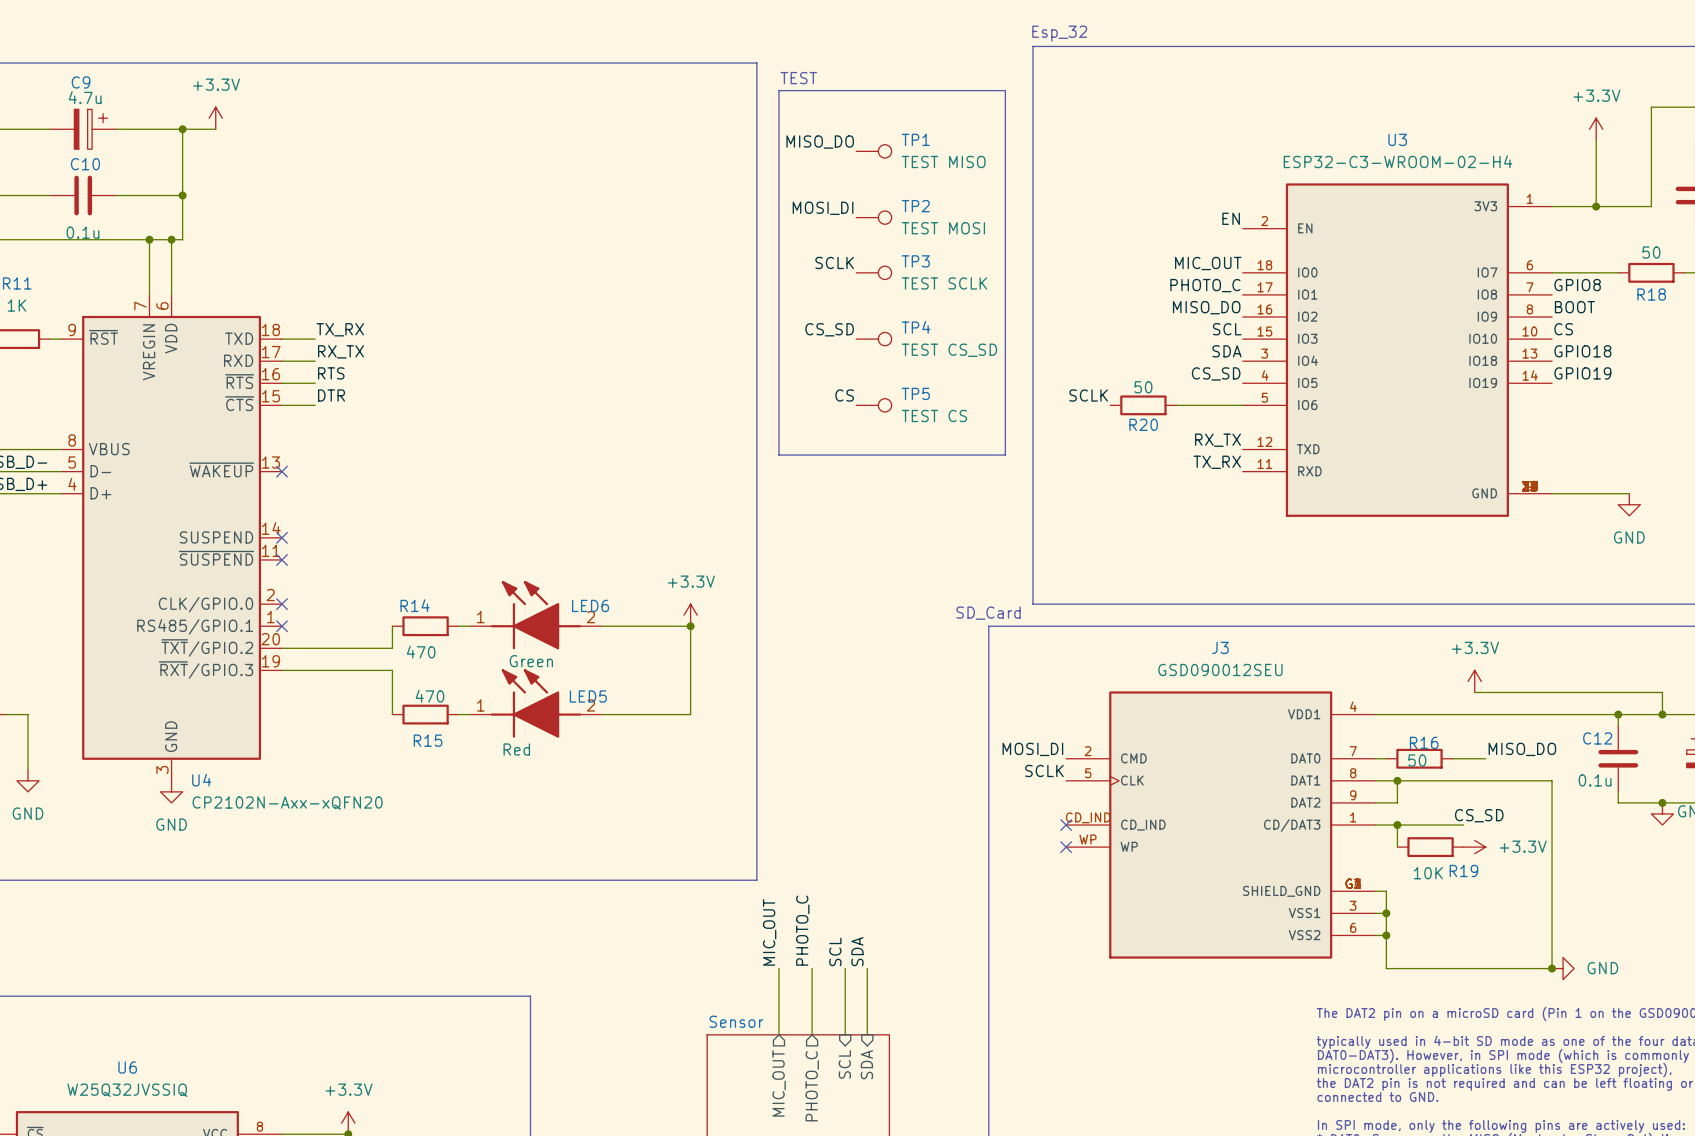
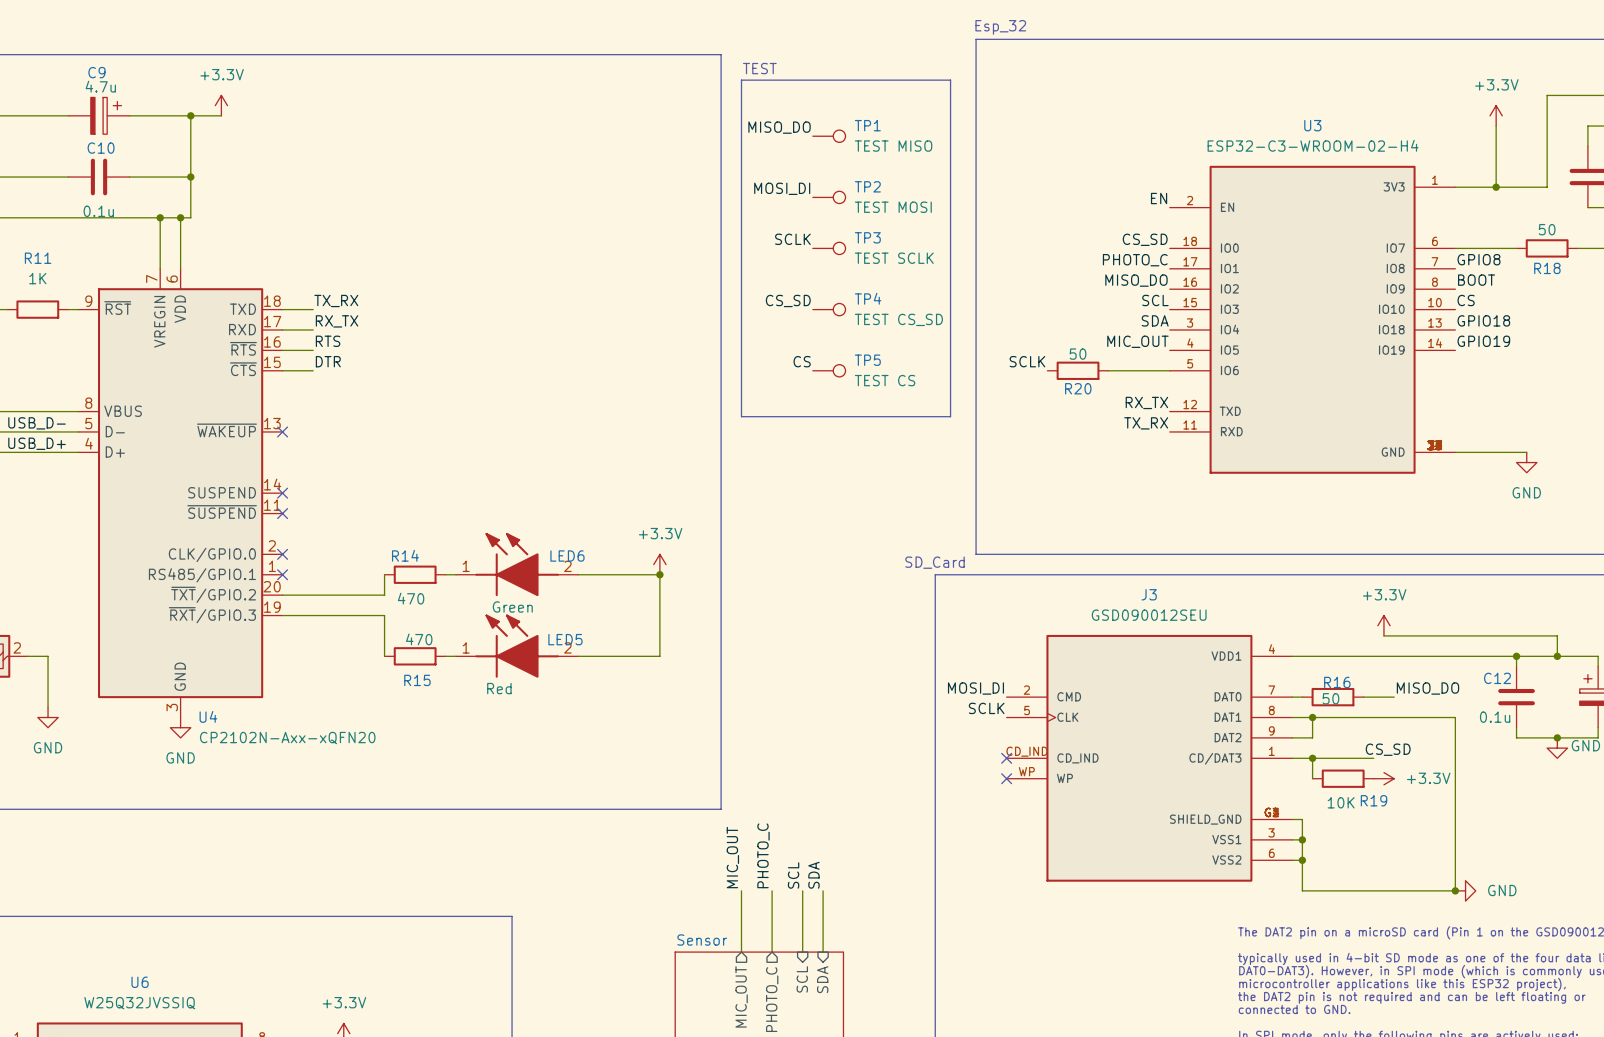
label: MIC_OUT (1208, 263) -> CS_SD (1145, 239)
label: CS_SD (1216, 373) -> MIC_OUT (1137, 341)

